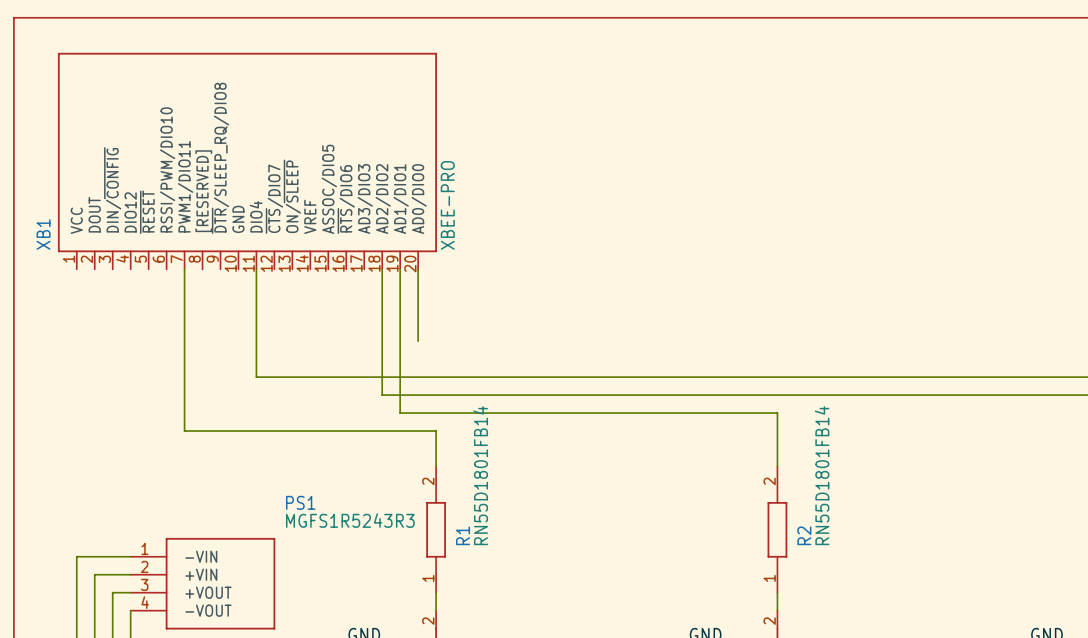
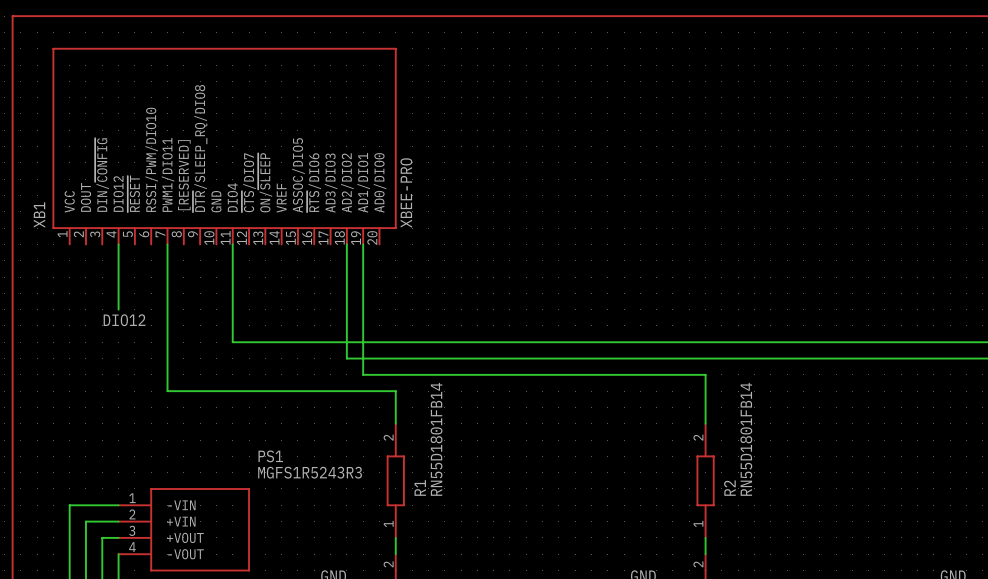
wire: none -> (118, 244) (118, 309)
wire: (418, 269) (418, 341) -> none
label: none -> DIO12 (124, 320)

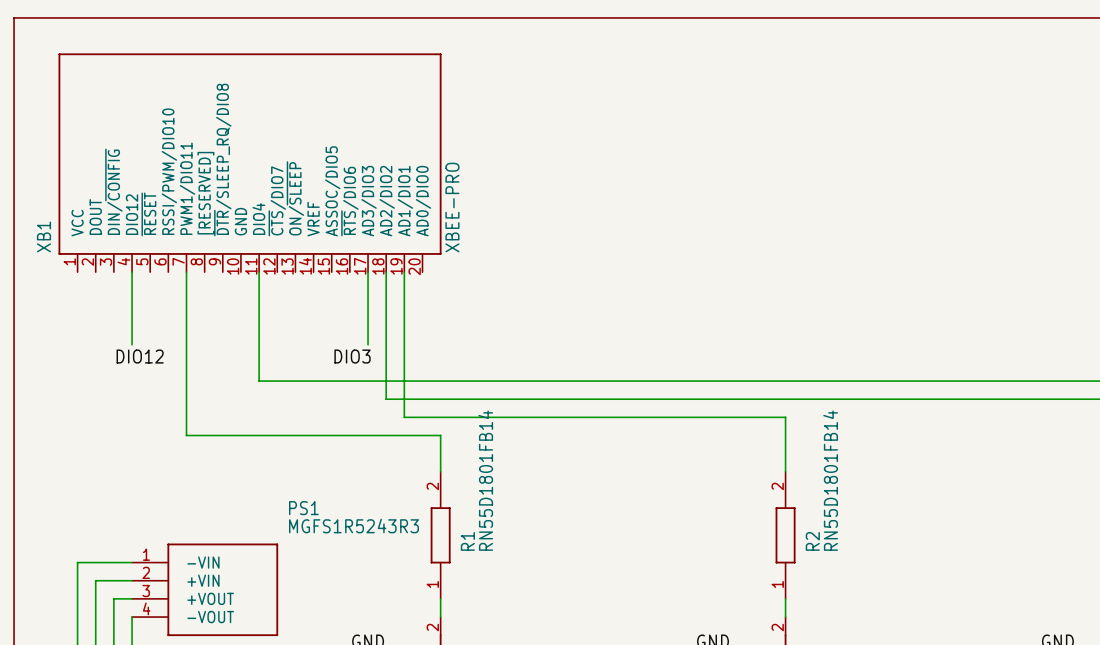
wire: none -> (368, 272) (368, 344)
label: none -> DIO3 (352, 356)

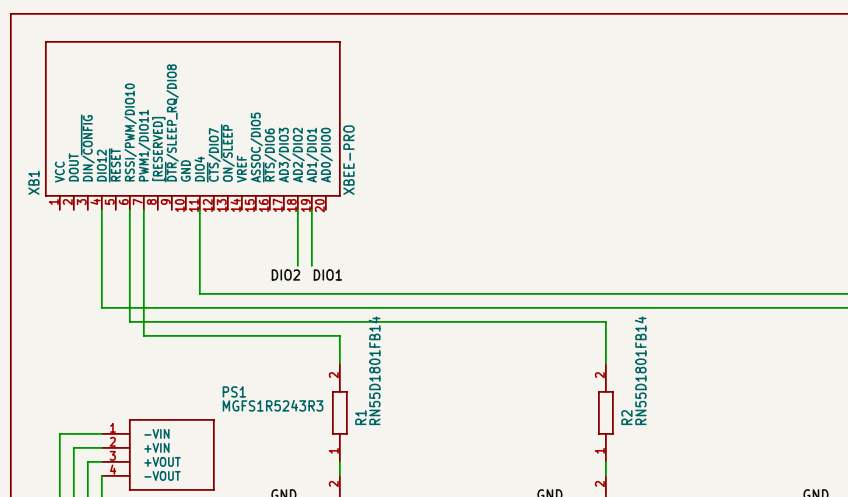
wire: (368, 272) (368, 344) -> none
wire: (386, 344) (386, 399) -> (101, 265) (101, 307) (297, 307)
wire: (404, 344) (404, 417) -> (129, 209) (129, 321) (311, 321)
label: DIO12 (140, 356) -> none
label: DIO3 (352, 356) -> DIO2 (285, 275)
label: none -> DIO1 (327, 275)

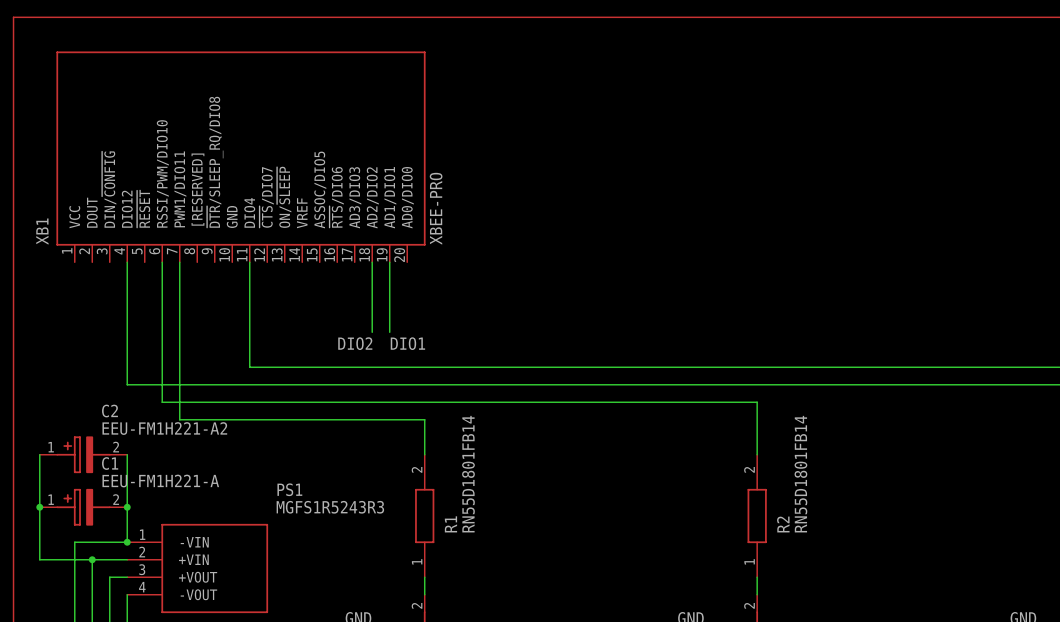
wire: none -> (39, 454) (39, 559) (92, 559)
C2: none -> EEU-FM1H221-A2 (83, 454)
wire: none -> (127, 454) (127, 542)
junction: none -> (39, 507)
C1: none -> EEU-FM1H221-A (83, 507)
junction: none -> (127, 507)
junction: none -> (127, 542)
junction: none -> (92, 559)

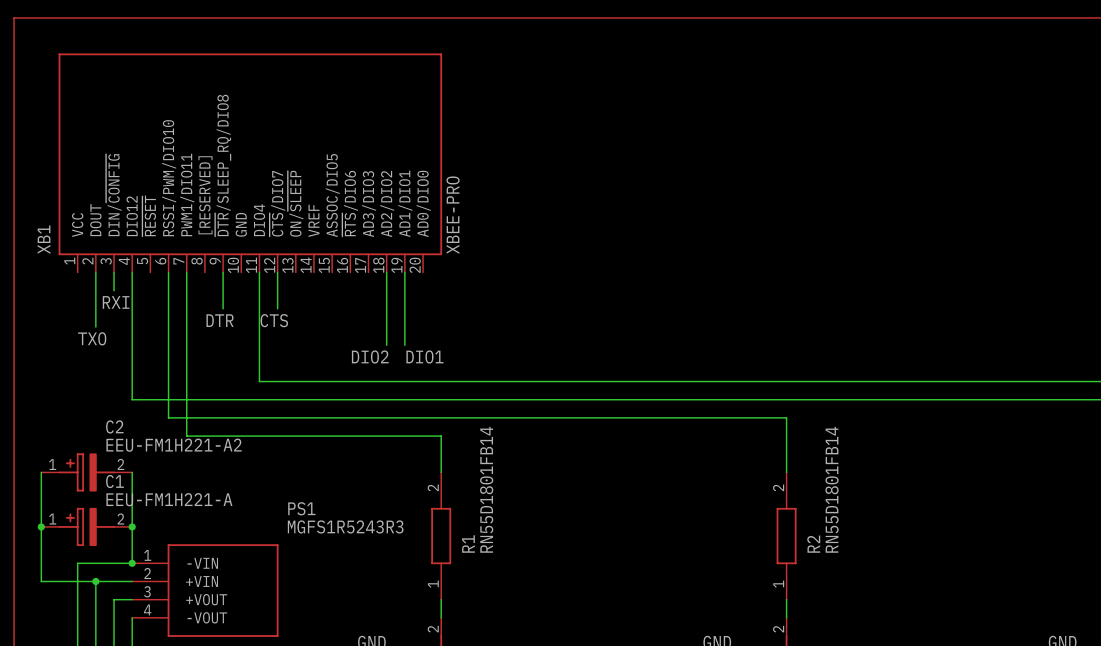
wire: none -> (95, 272) (95, 327)
wire: none -> (114, 272) (114, 290)
wire: none -> (223, 272) (223, 308)
wire: none -> (277, 272) (277, 308)
label: none -> RXI (116, 302)
label: none -> DTR (220, 320)
label: none -> CTS (274, 320)
label: none -> TXO (92, 338)

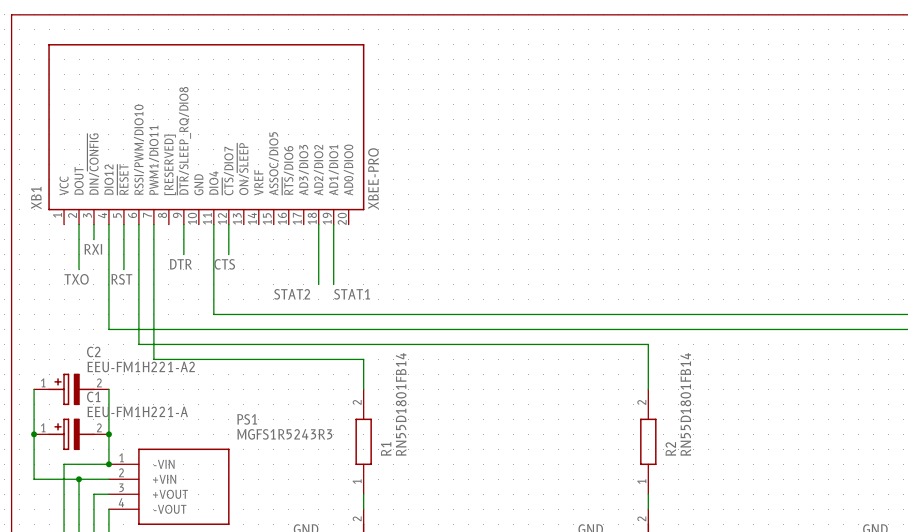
wire: none -> (123, 224) (123, 269)
label: none -> RST (121, 279)
label: none -> STAT2 (292, 294)
label: DIO2 (370, 357) -> none
label: DIO1 (424, 357) -> STAT1 (352, 294)

